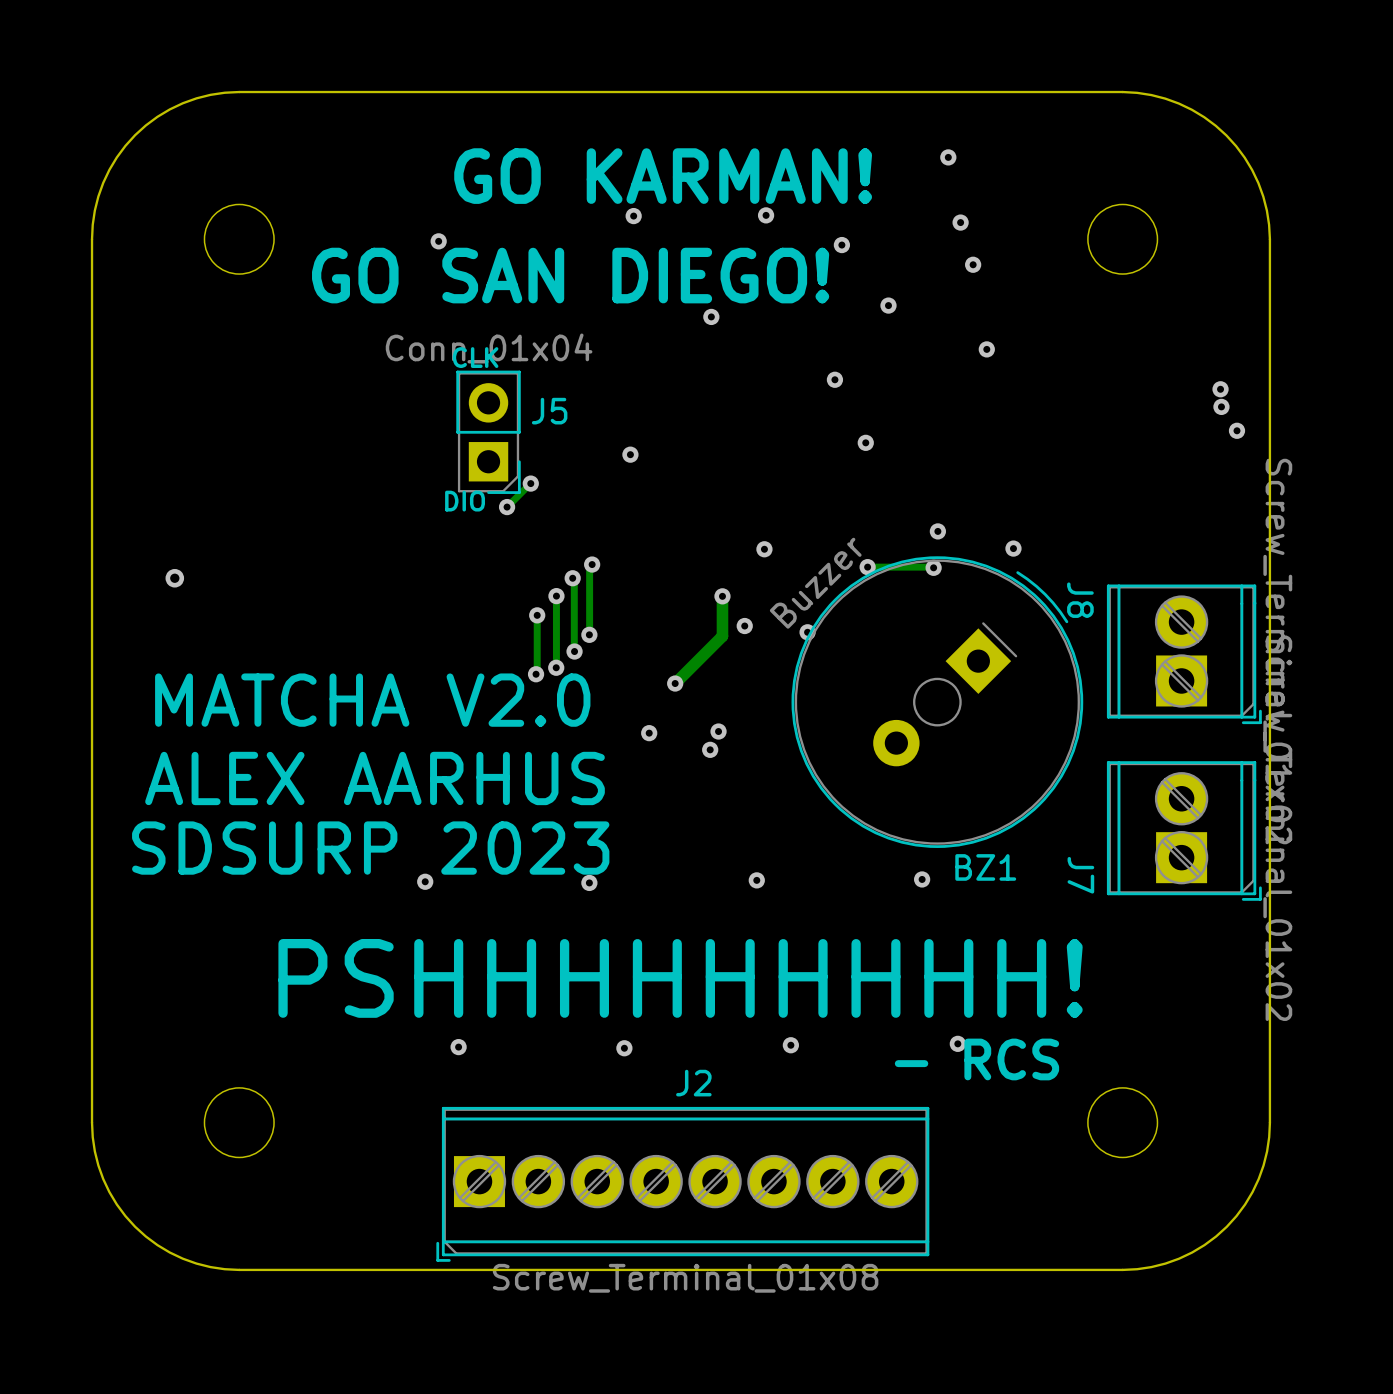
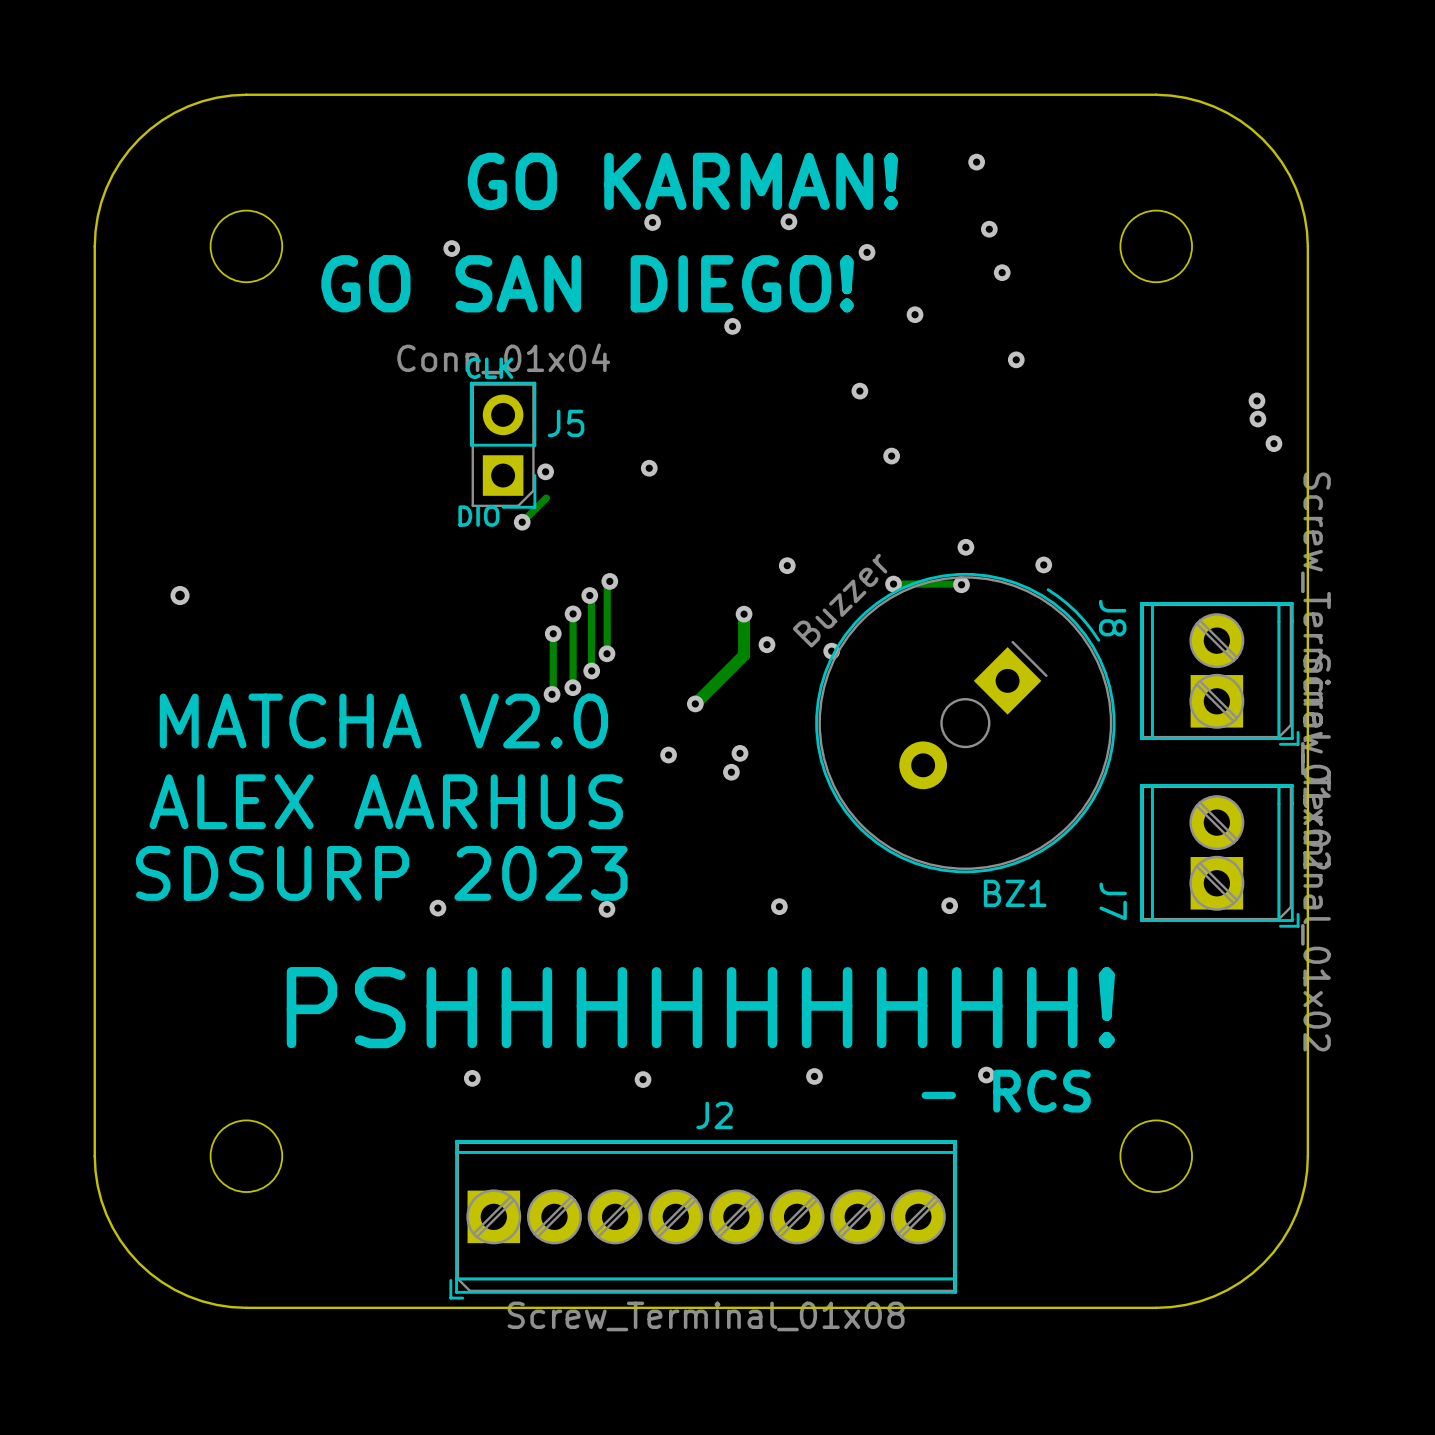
via position: (530, 483) -> (545, 471)

